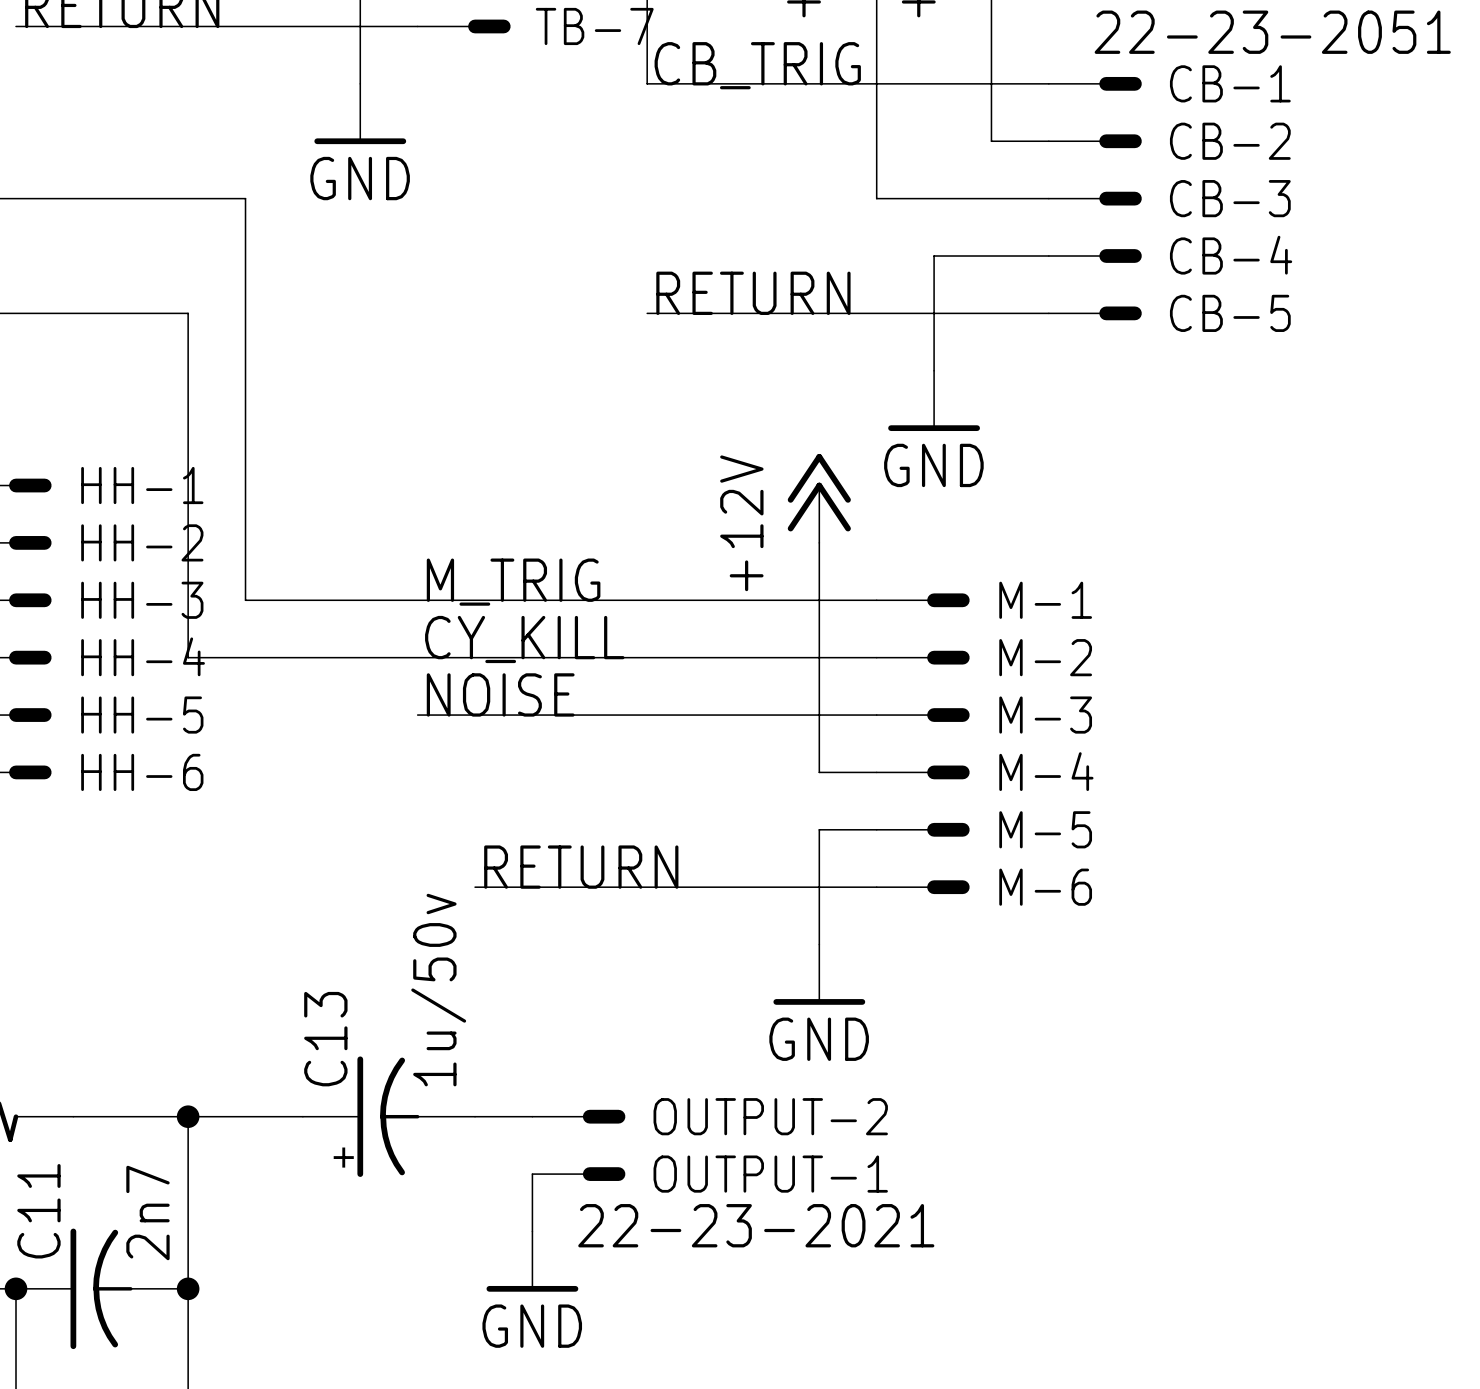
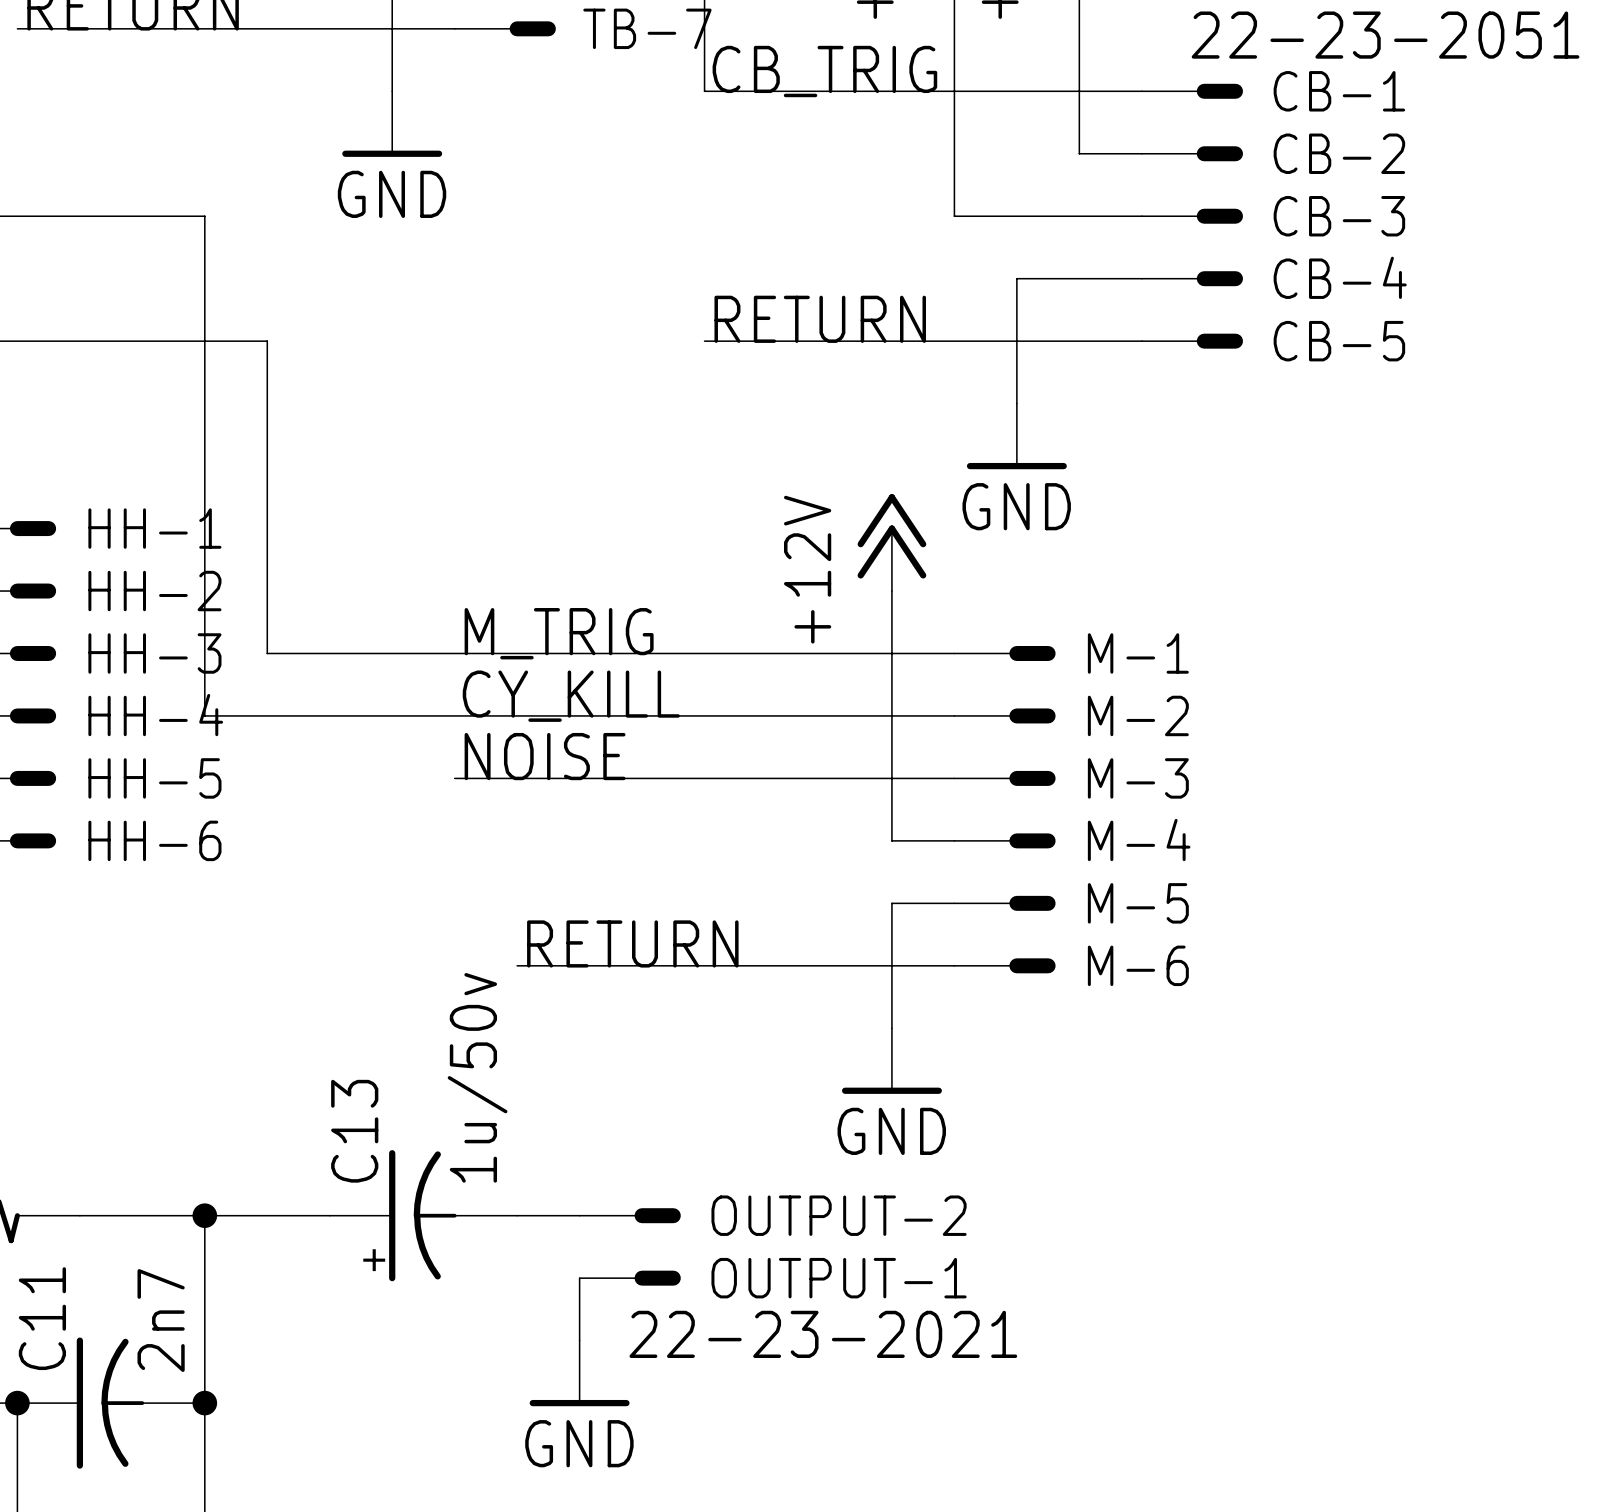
wire: (188, 198) (245, 198) (245, 313) -> (204, 216) (204, 341) (267, 341)

